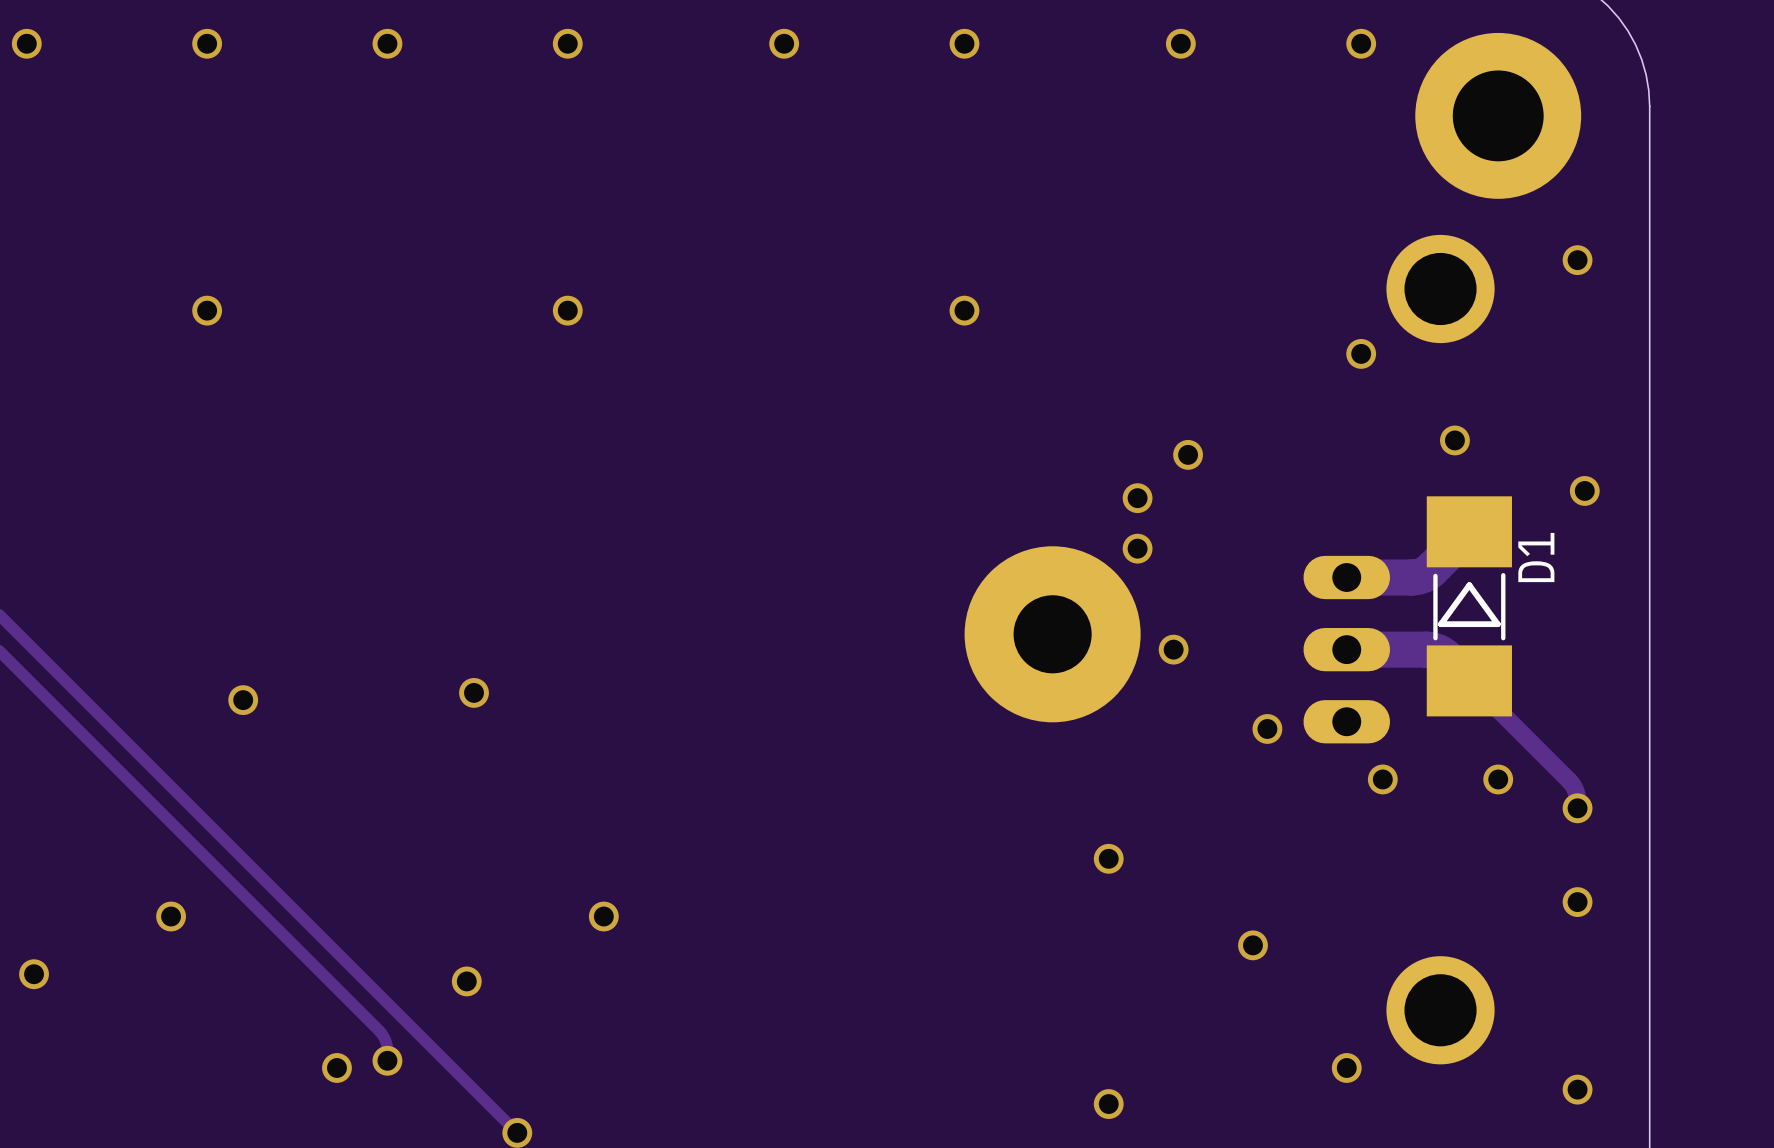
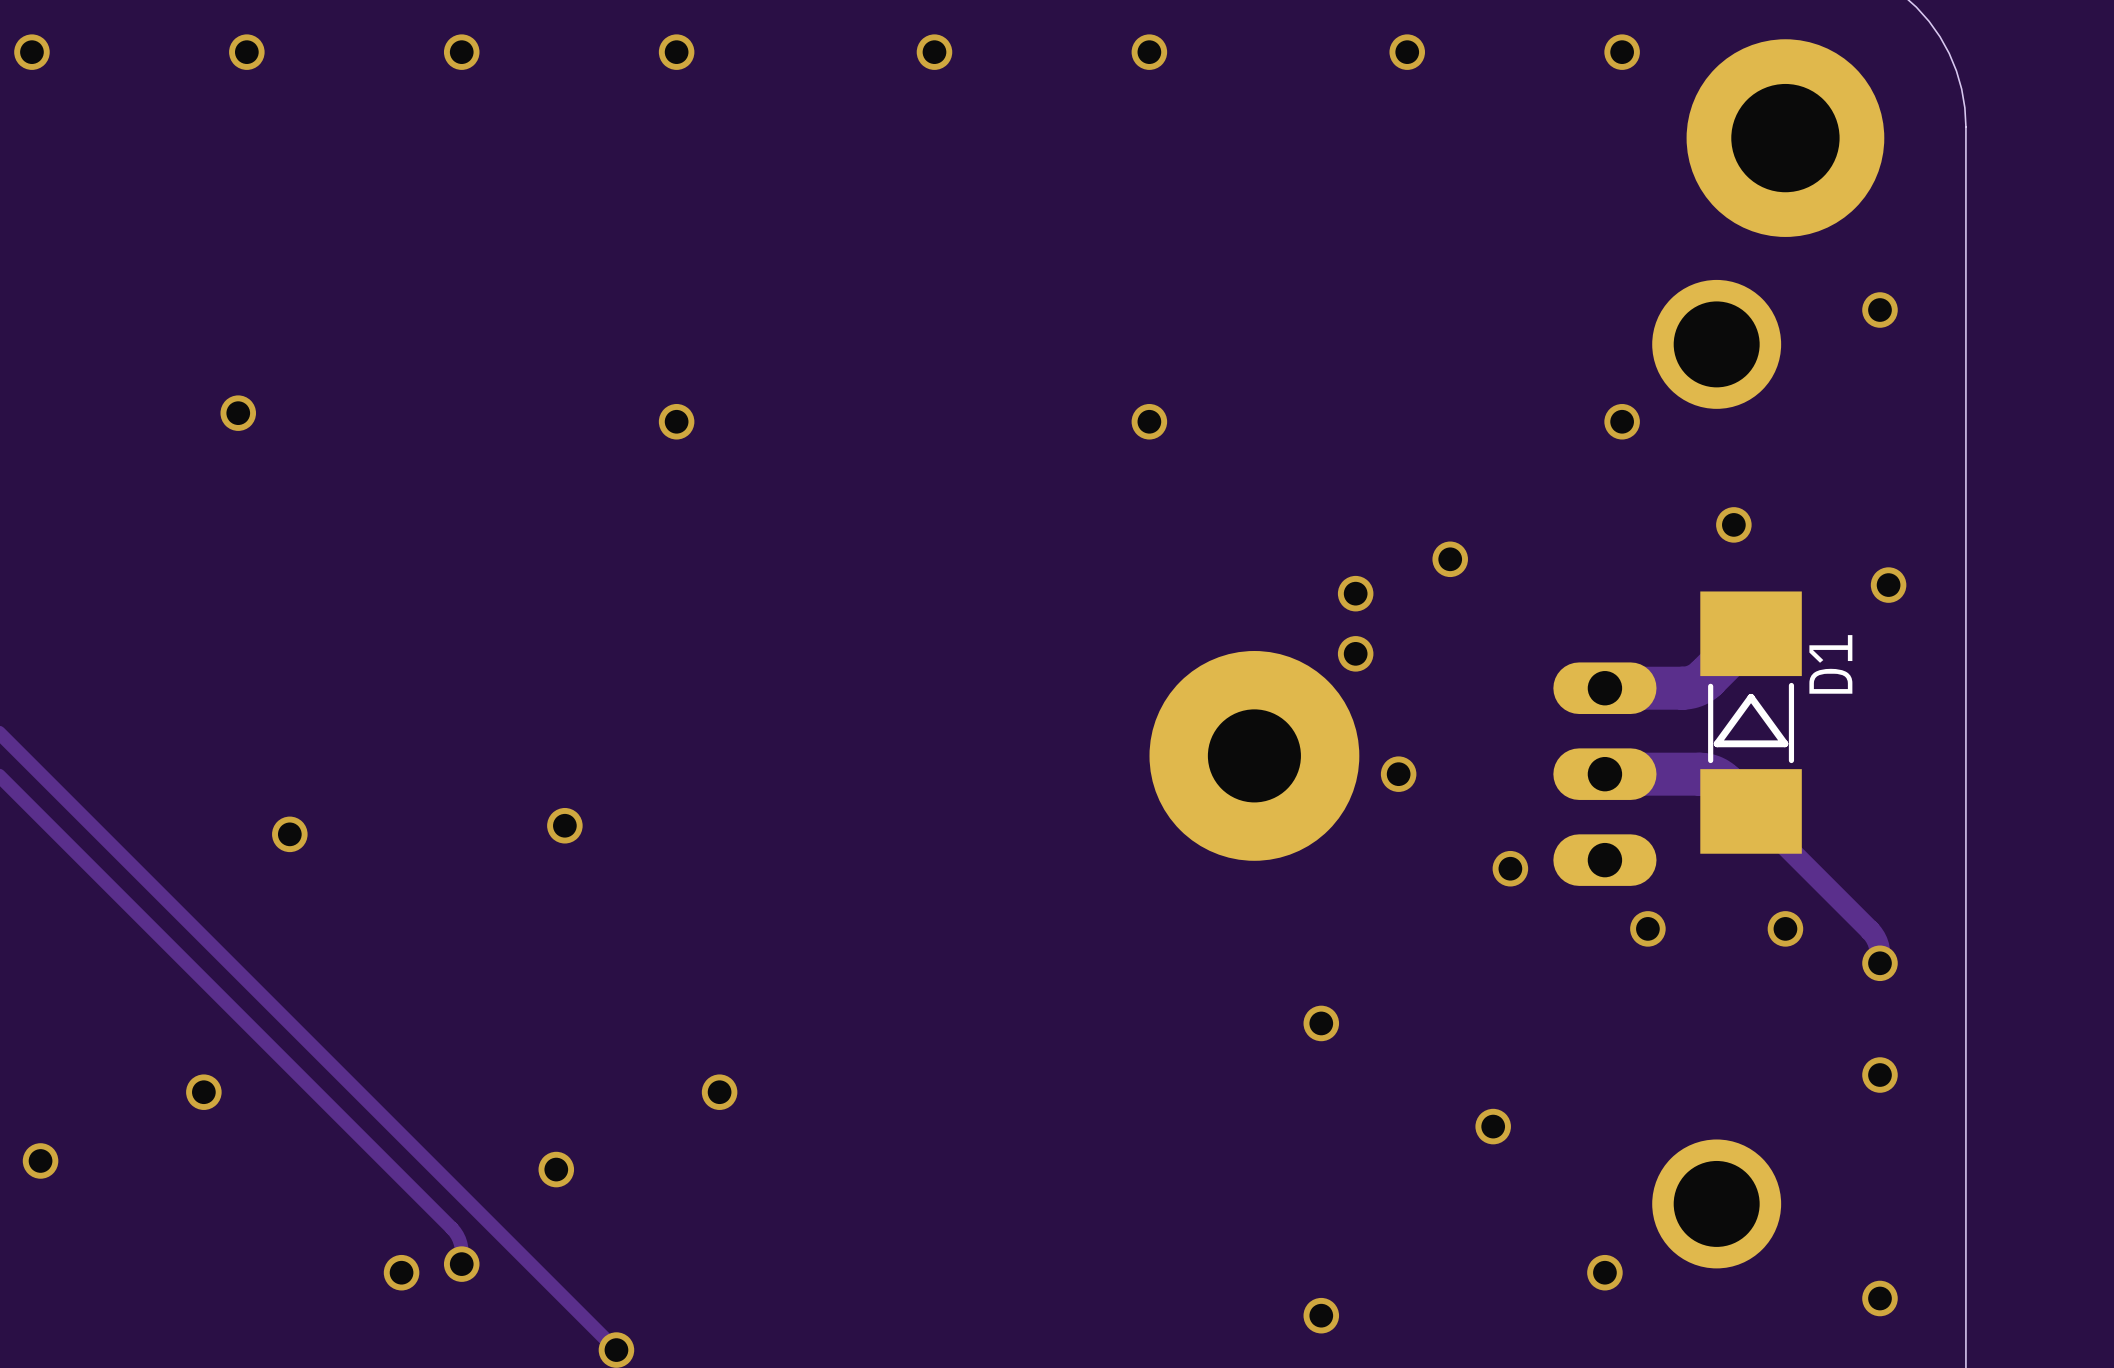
via position: (207, 310) -> (238, 413)
via position: (567, 310) -> (676, 421)
via position: (964, 310) -> (1149, 421)
via position: (1188, 454) -> (1450, 559)

